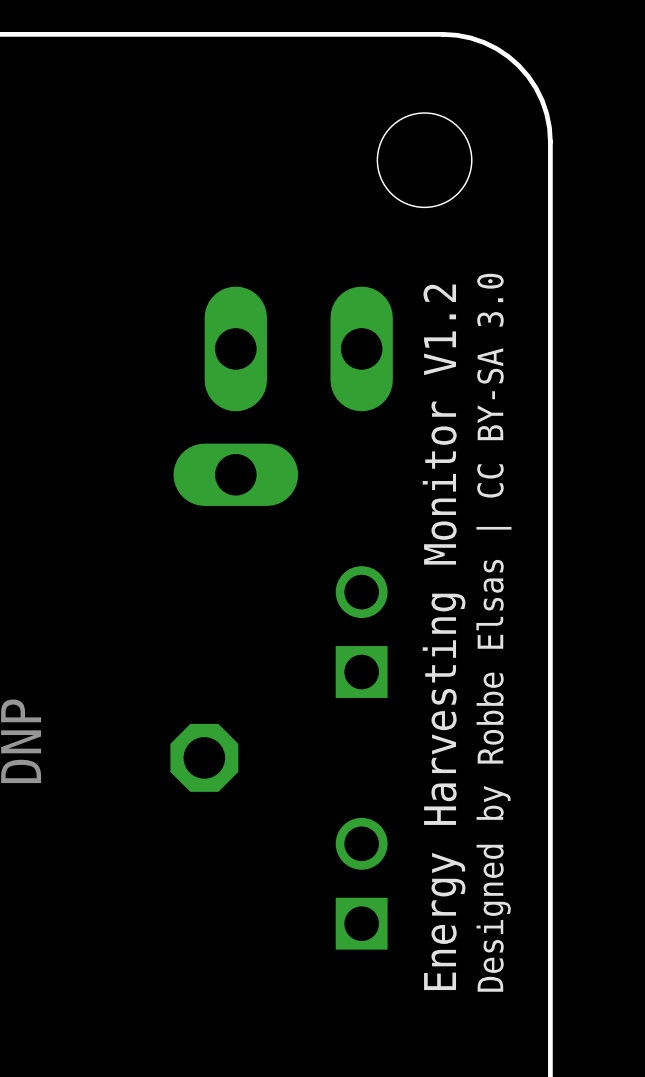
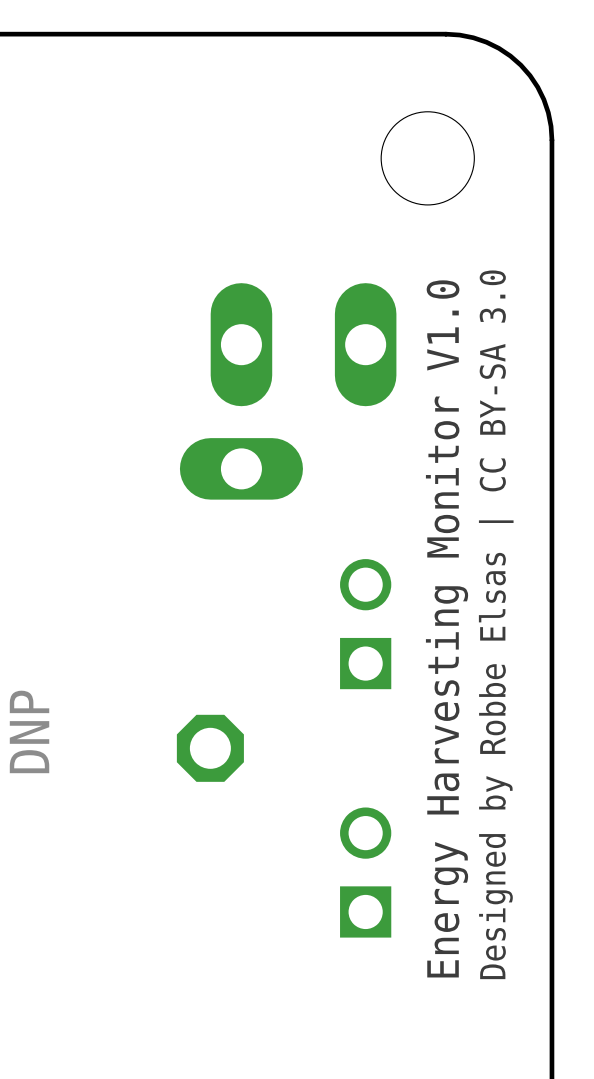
text: Energy Harvesting Monitor V1.2 (444, 637) -> Energy Harvesting Monitor V1.0 (447, 628)

